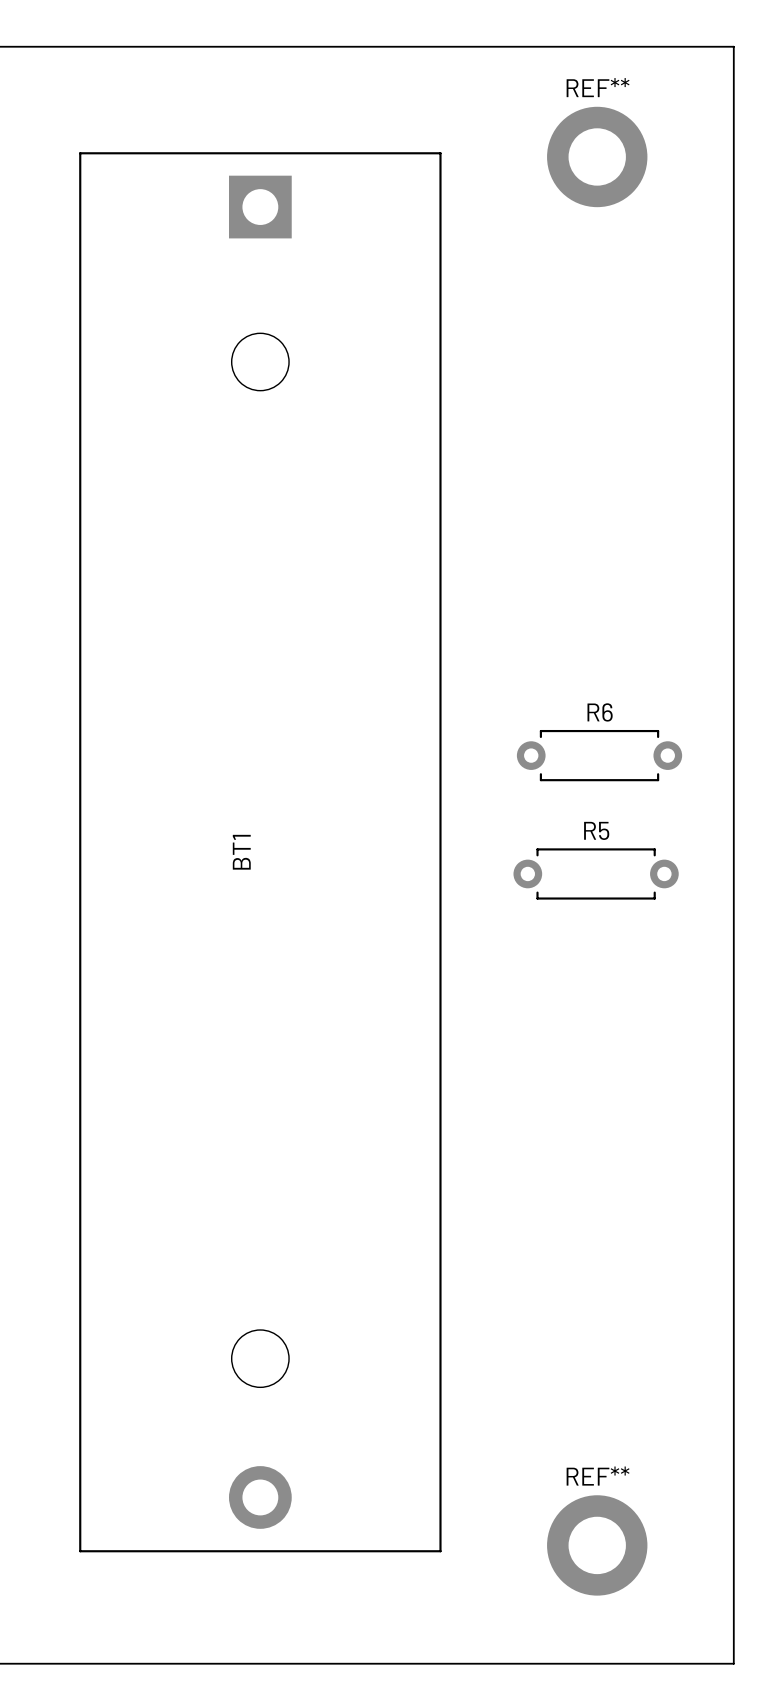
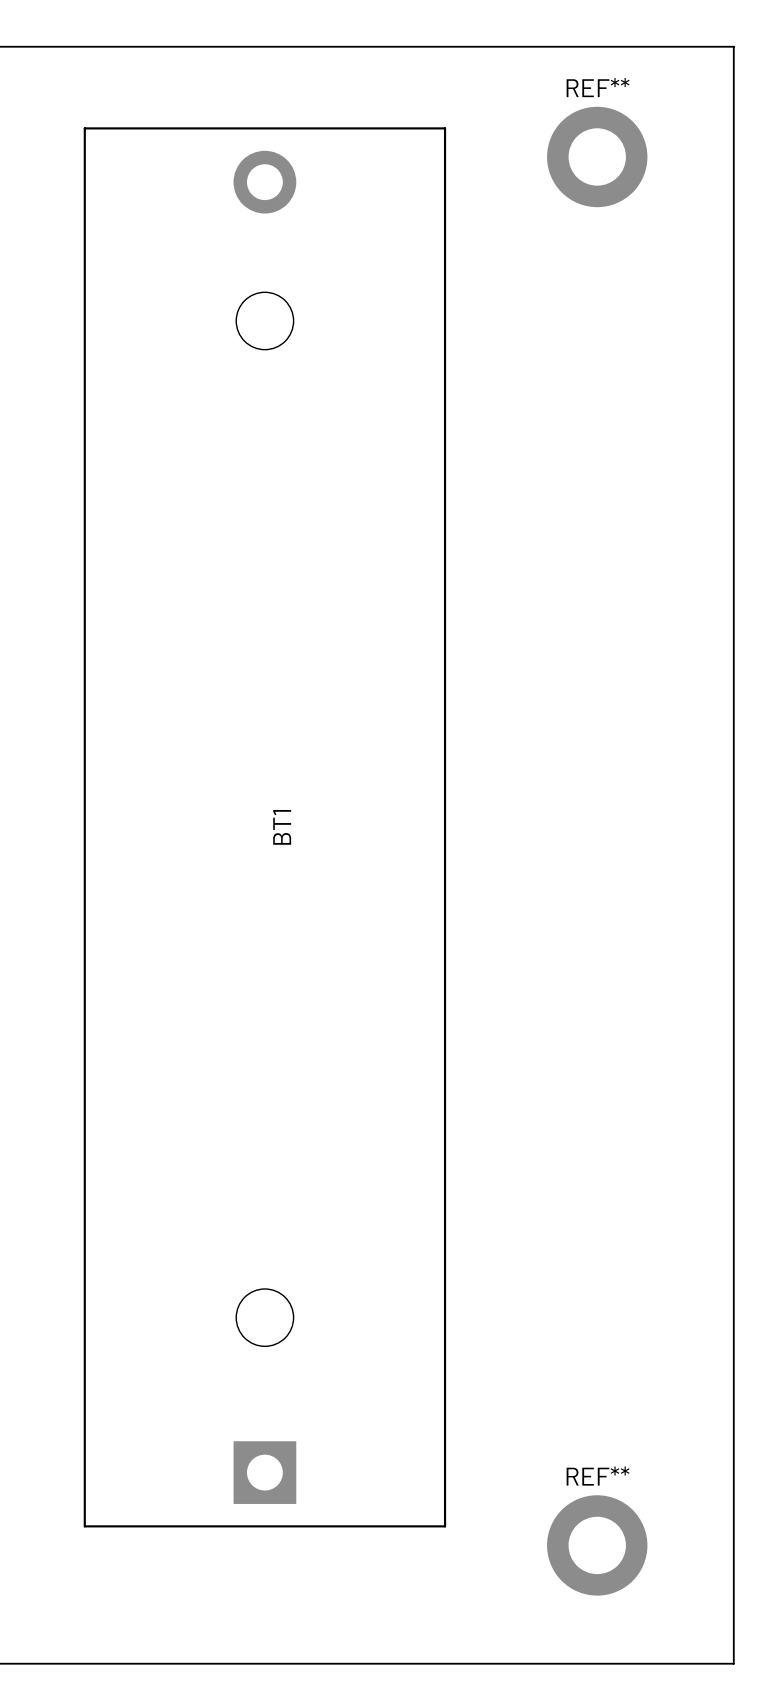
R6: (599, 755) -> none
BT1 rotation: 0° (260, 852) -> 180° (264, 827)
R5: (596, 873) -> none

